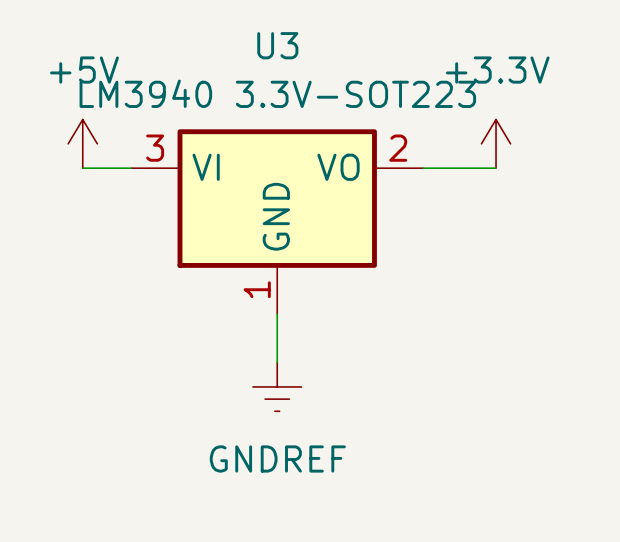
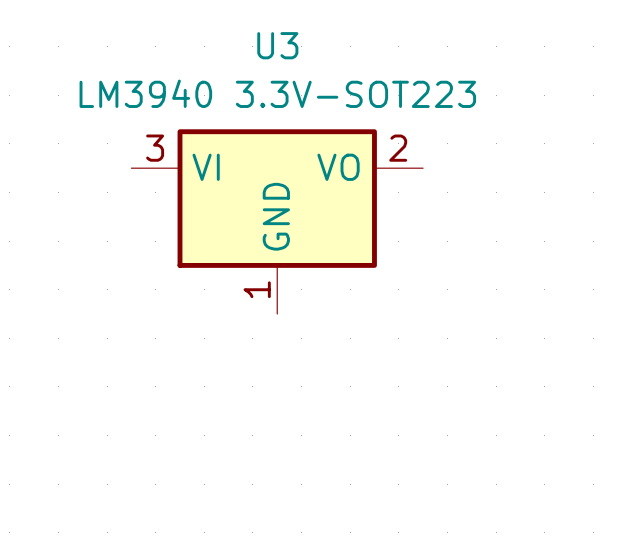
power symbol: +5V (82, 143) -> none
power symbol: +3.3V (496, 143) -> none
wire: (82, 168) (131, 168) -> none
wire: (423, 168) (496, 168) -> none
wire: (277, 314) (277, 362) -> none
power symbol: GNDREF (277, 386) -> none

